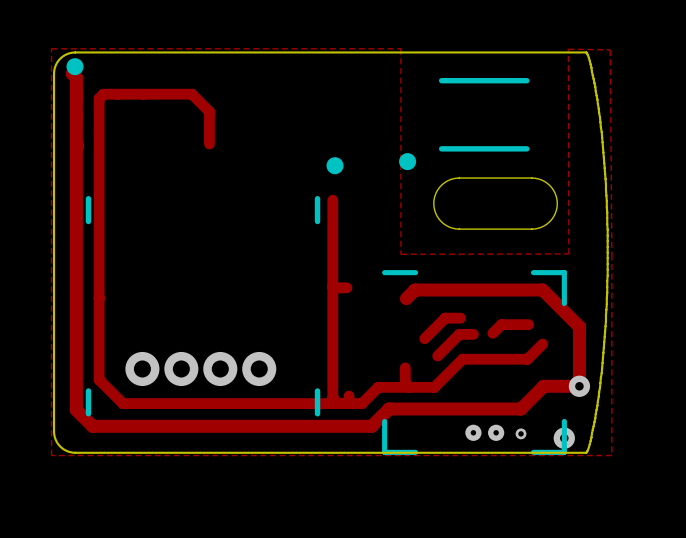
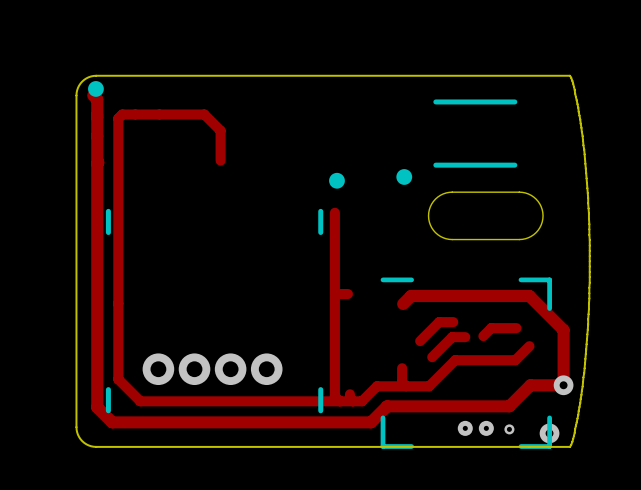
zone outline: (51, 48) (51, 455) (611, 455) (610, 49) (568, 49) (568, 253) (400, 254) (400, 48) (51, 48) -> none

